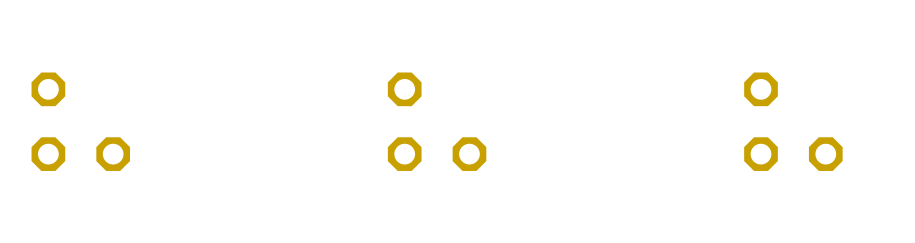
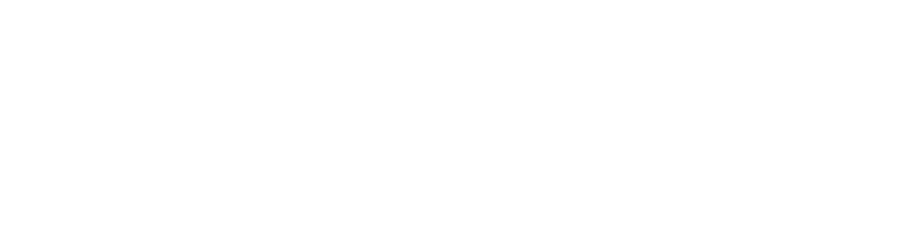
part: (80, 121) -> none
part: (437, 121) -> none
part: (793, 121) -> none

